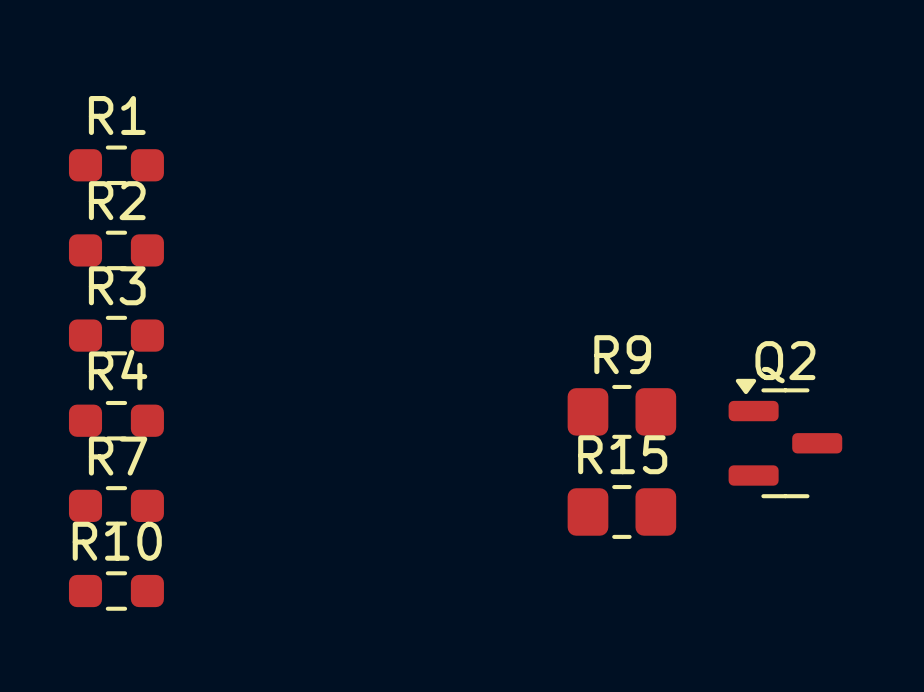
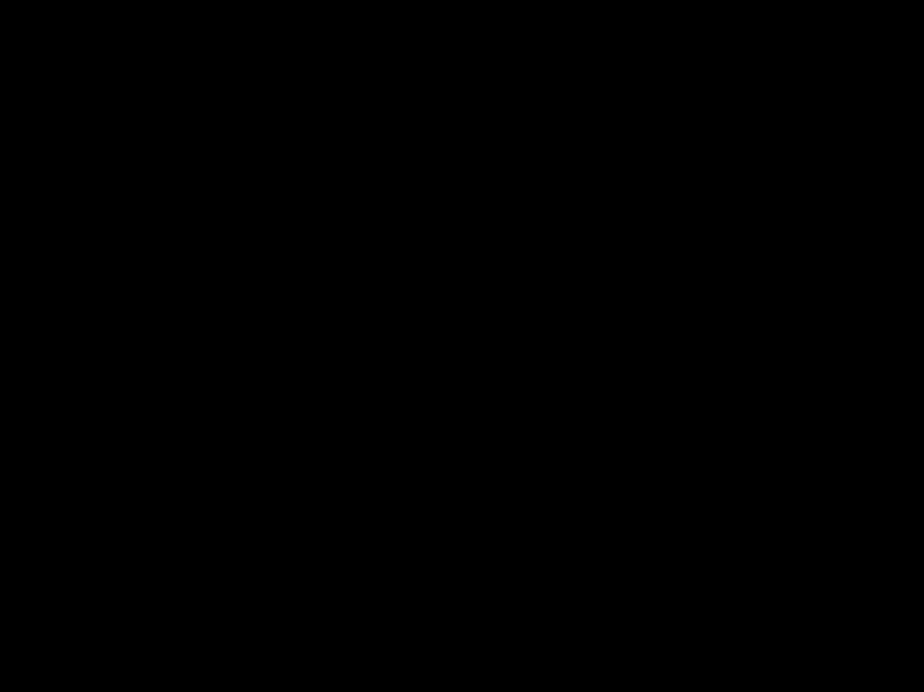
R1: (116, 165) -> none
R2: (116, 250) -> none
R3: (116, 335) -> none
R9: (621, 411) -> none
R4: (116, 420) -> none
Q2: (785, 438) -> none
R7: (116, 505) -> none
R15: (621, 511) -> none
R10: (116, 591) -> none

